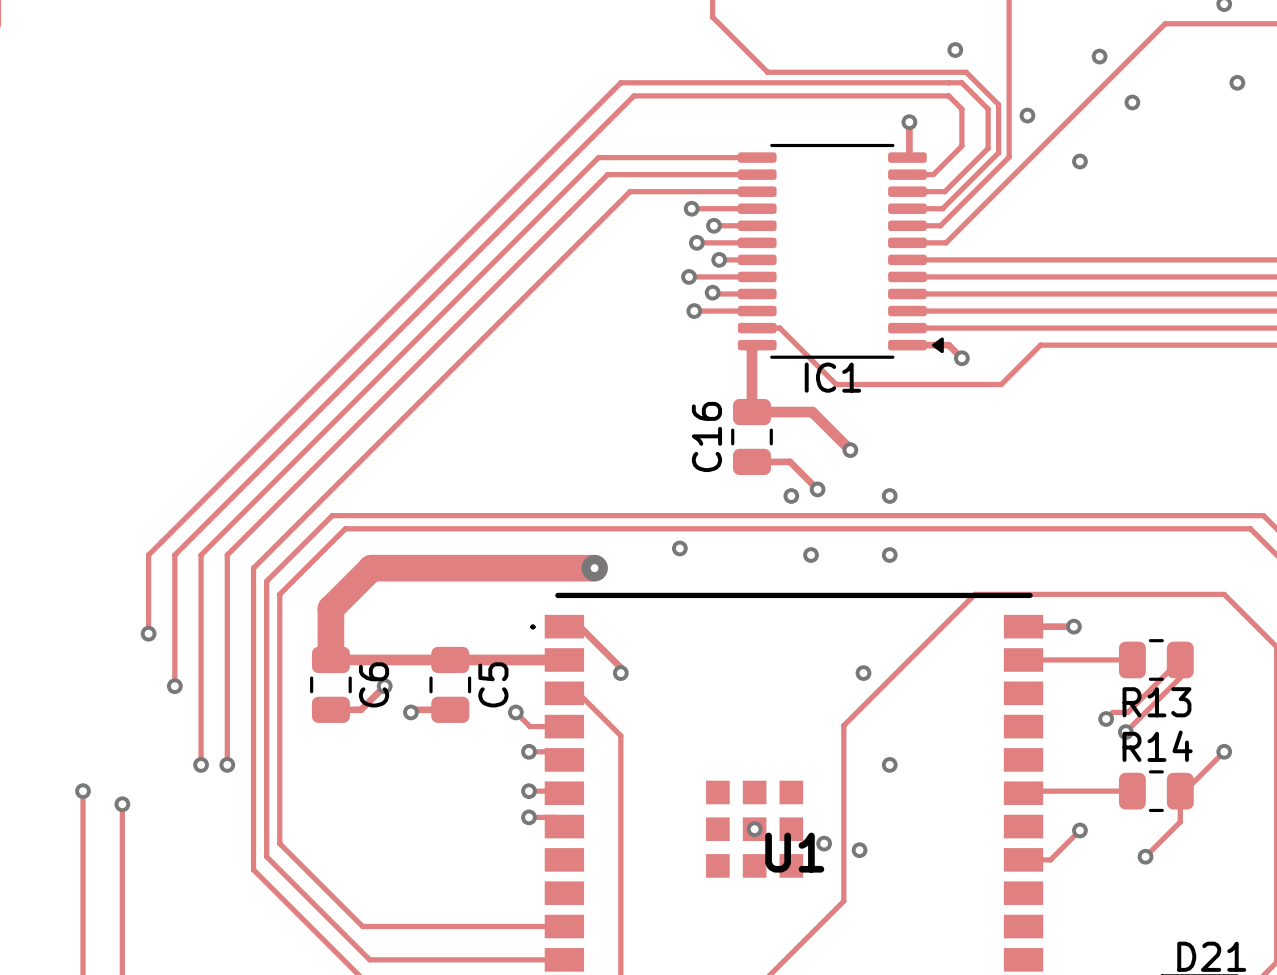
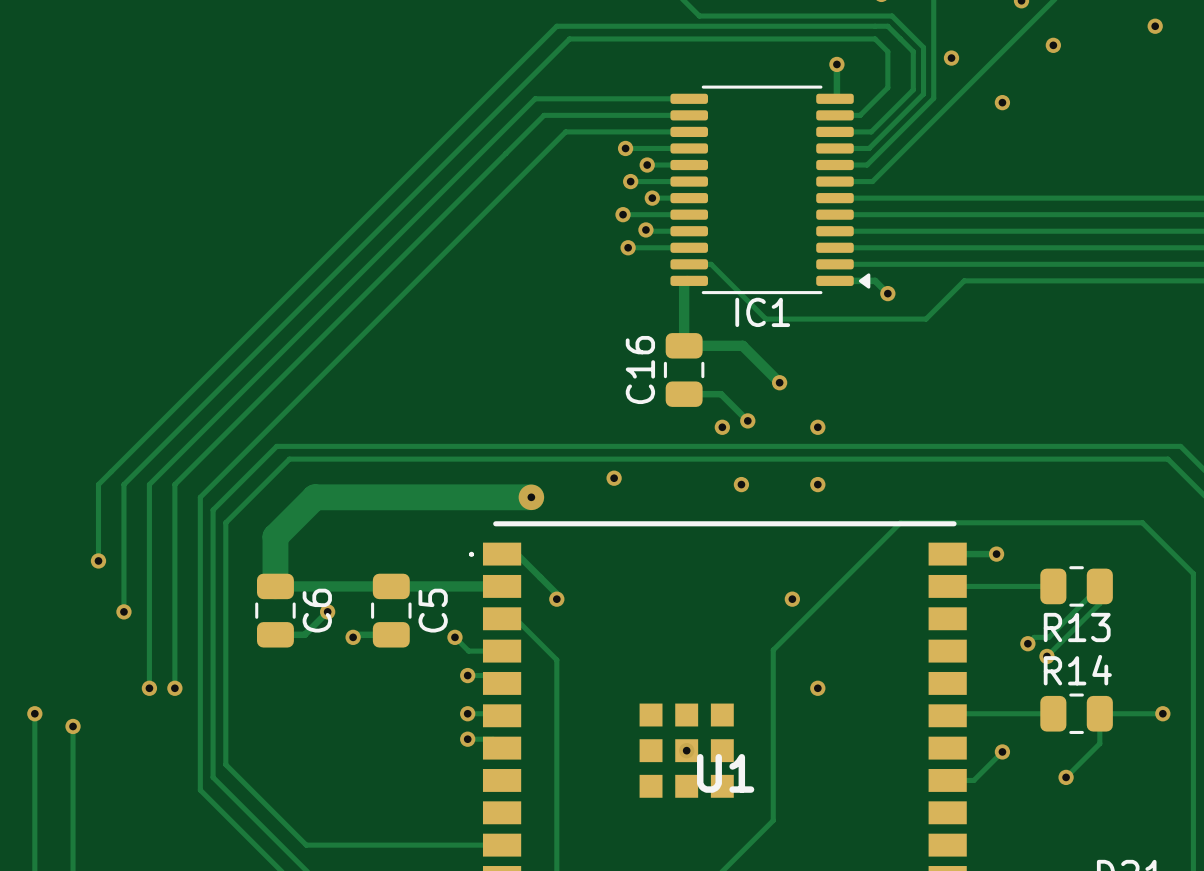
track: (1224, 751) (1184, 791) -> (1162, 713) (1104, 713)
via position: (1224, 751) -> (1162, 713)
via: (824, 843) -> none
via: (859, 850) -> none

